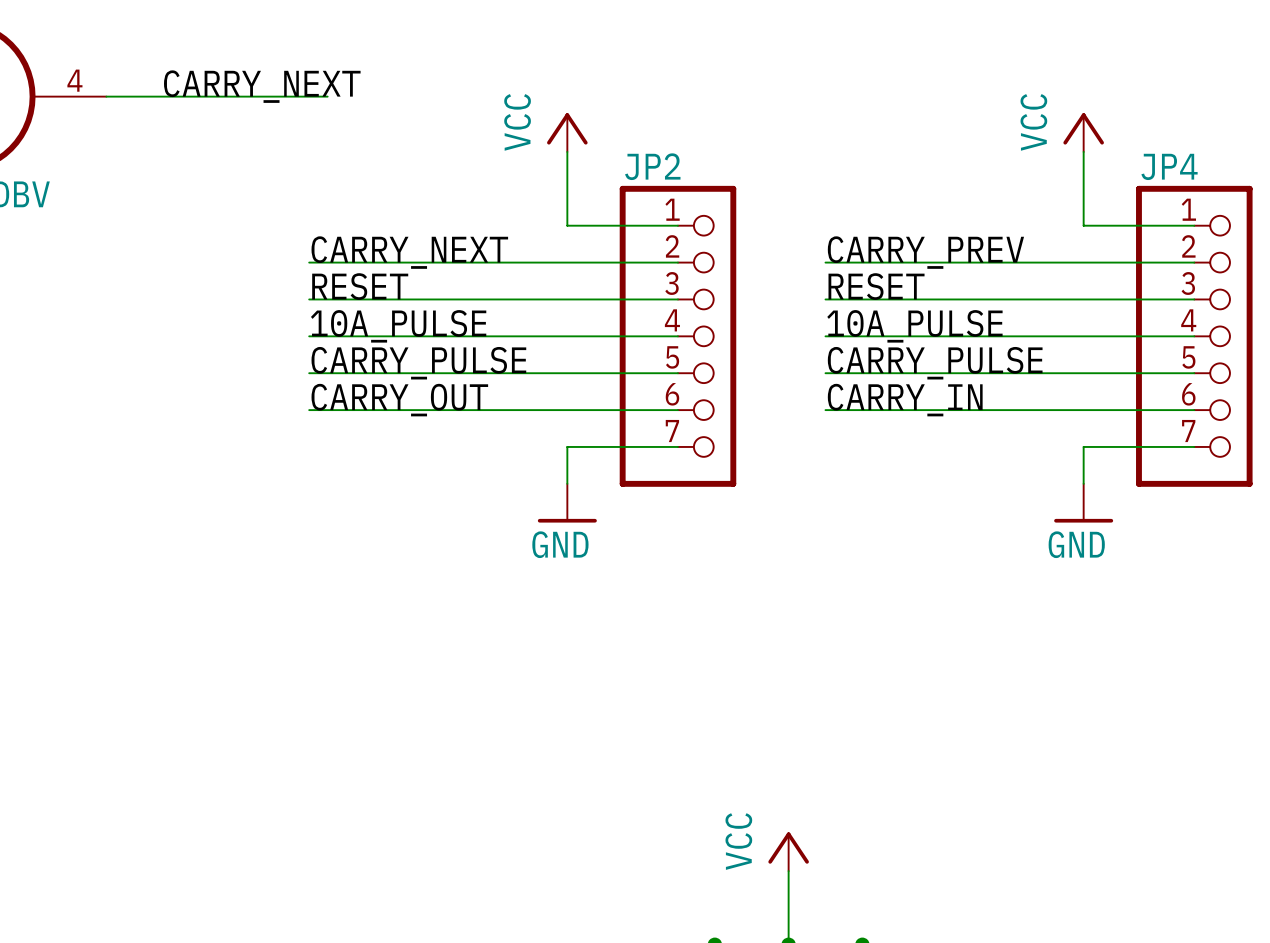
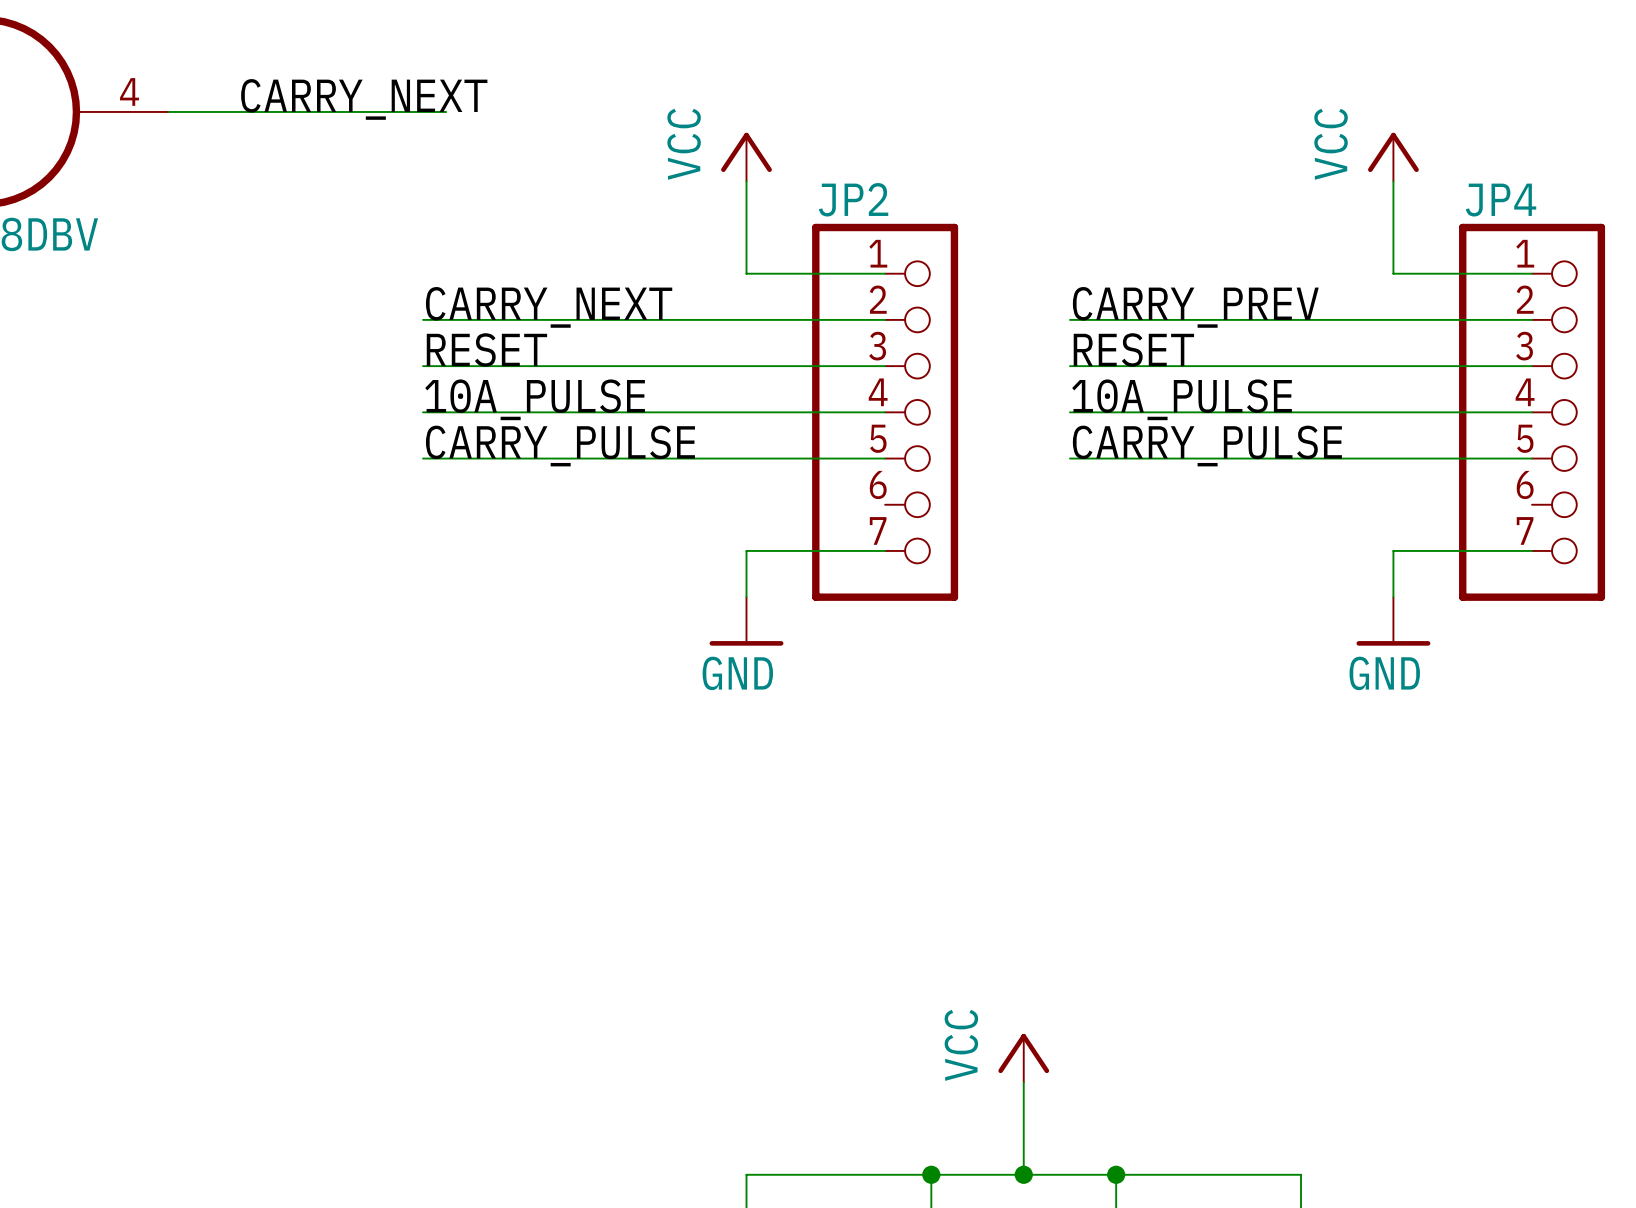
label: CARRY_OUT (399, 400) -> none
label: CARRY_IN (905, 400) -> none
wire: (309, 410) (677, 410) -> none
wire: (825, 410) (1194, 410) -> none

